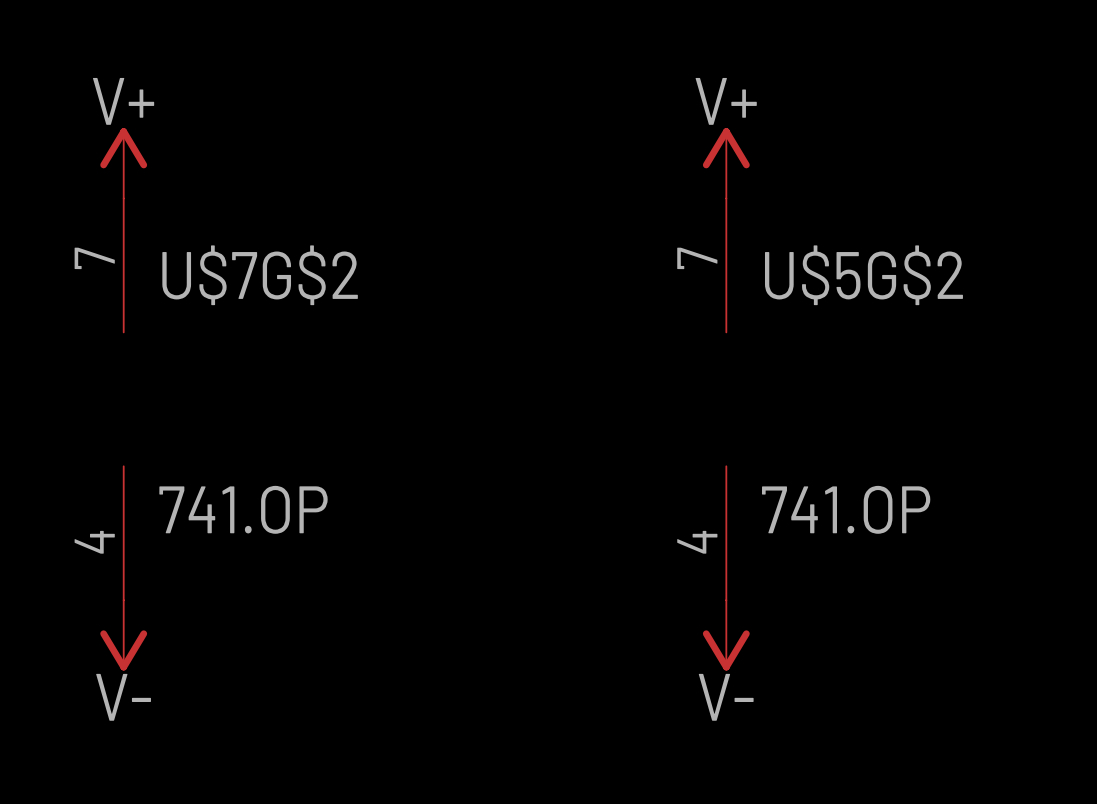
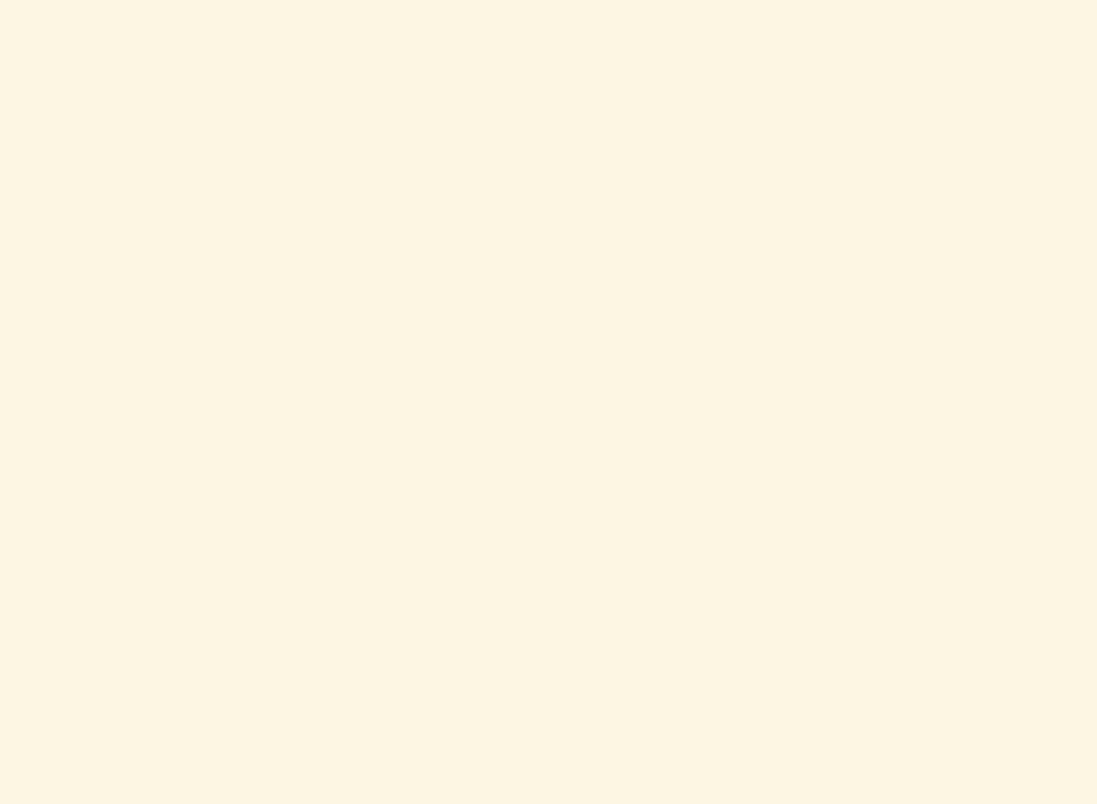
power symbol: V+ (123, 163) -> none
power symbol: V+ (726, 163) -> none
U$7G$2: 741.OP (123, 399) -> none
U$5G$2: 741.OP (726, 399) -> none
power symbol: V- (123, 635) -> none
power symbol: V- (726, 635) -> none

